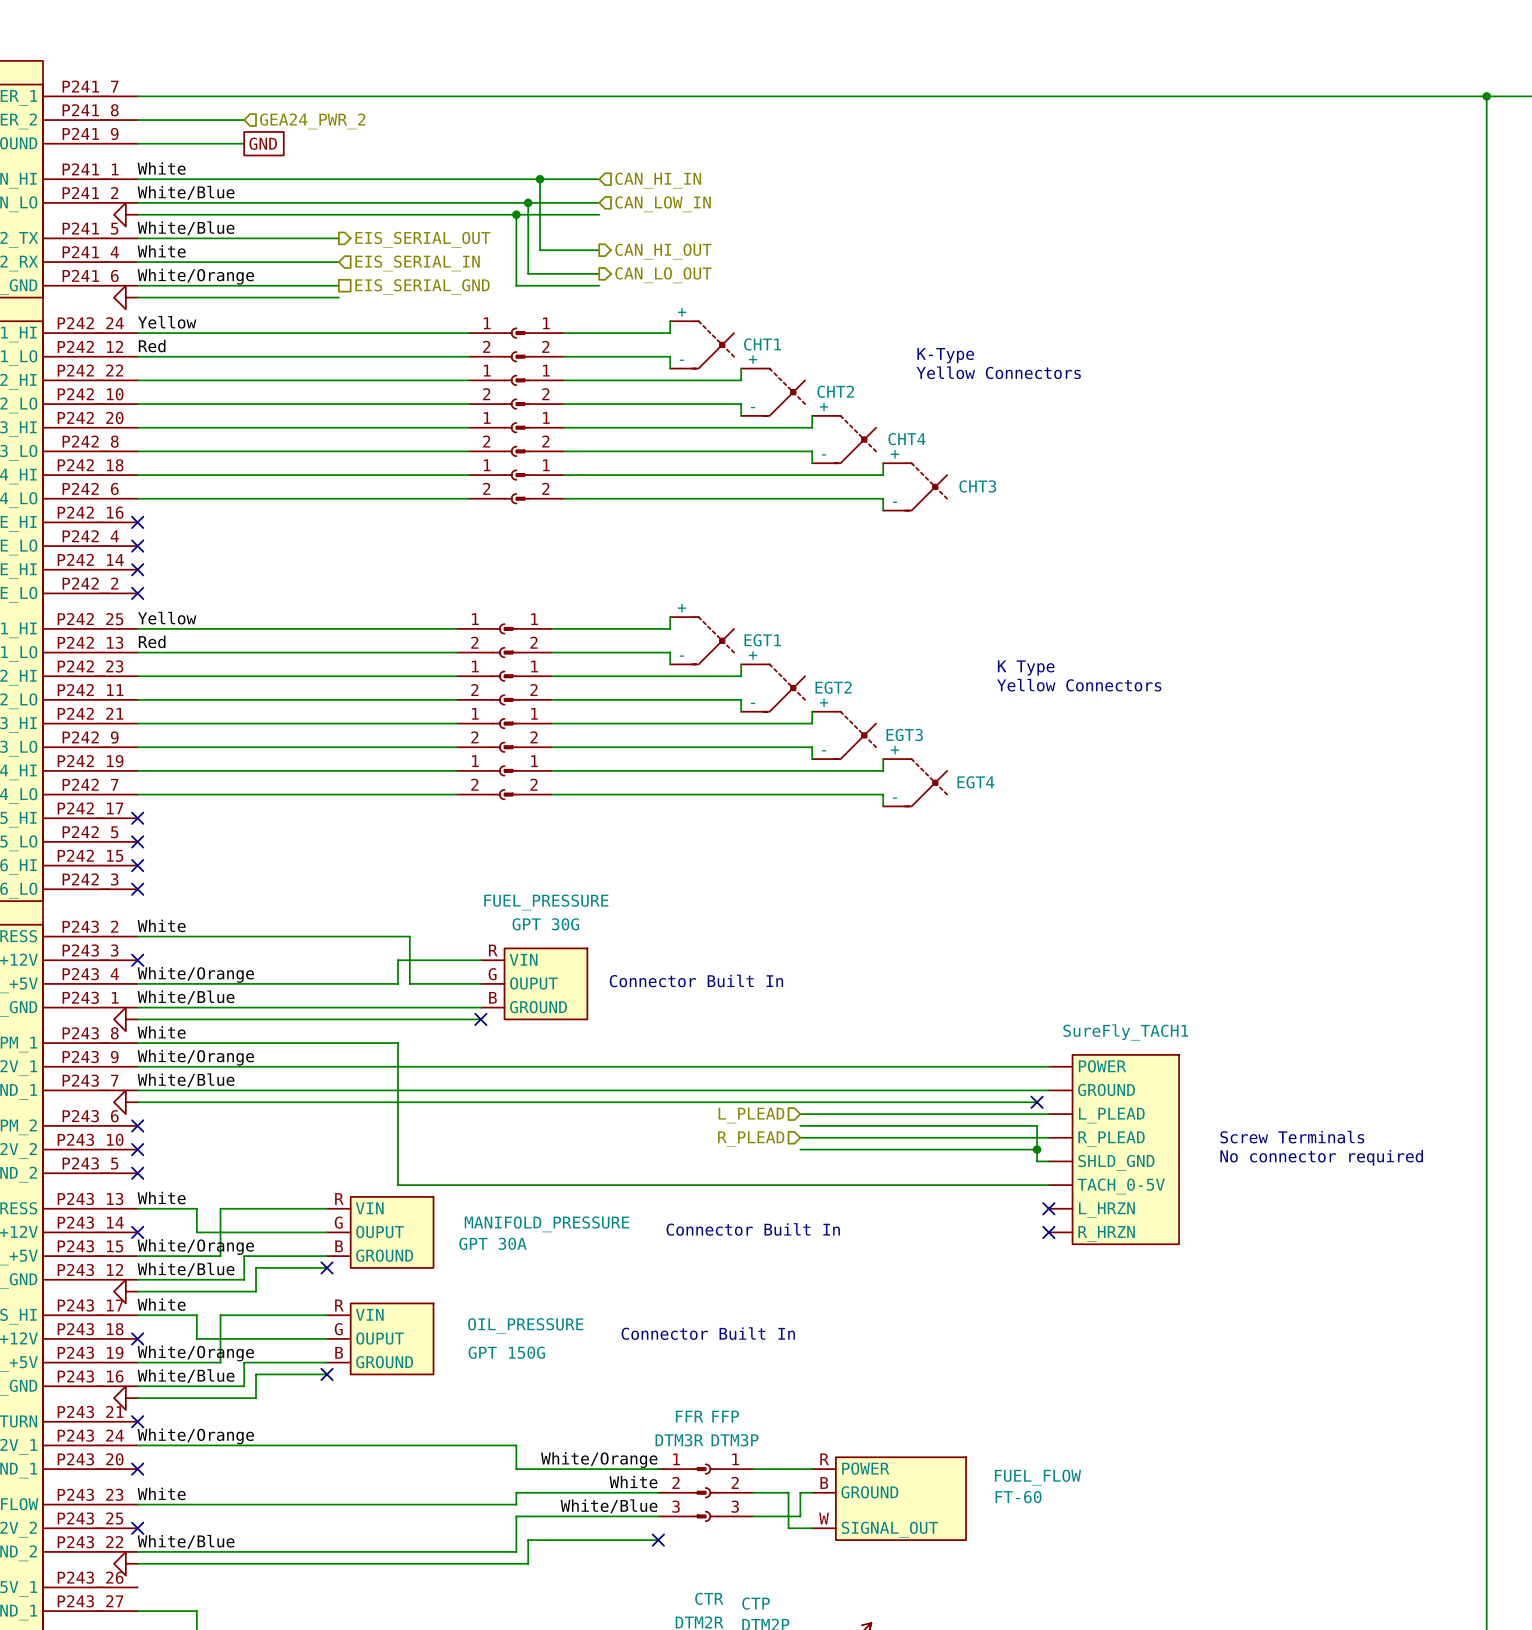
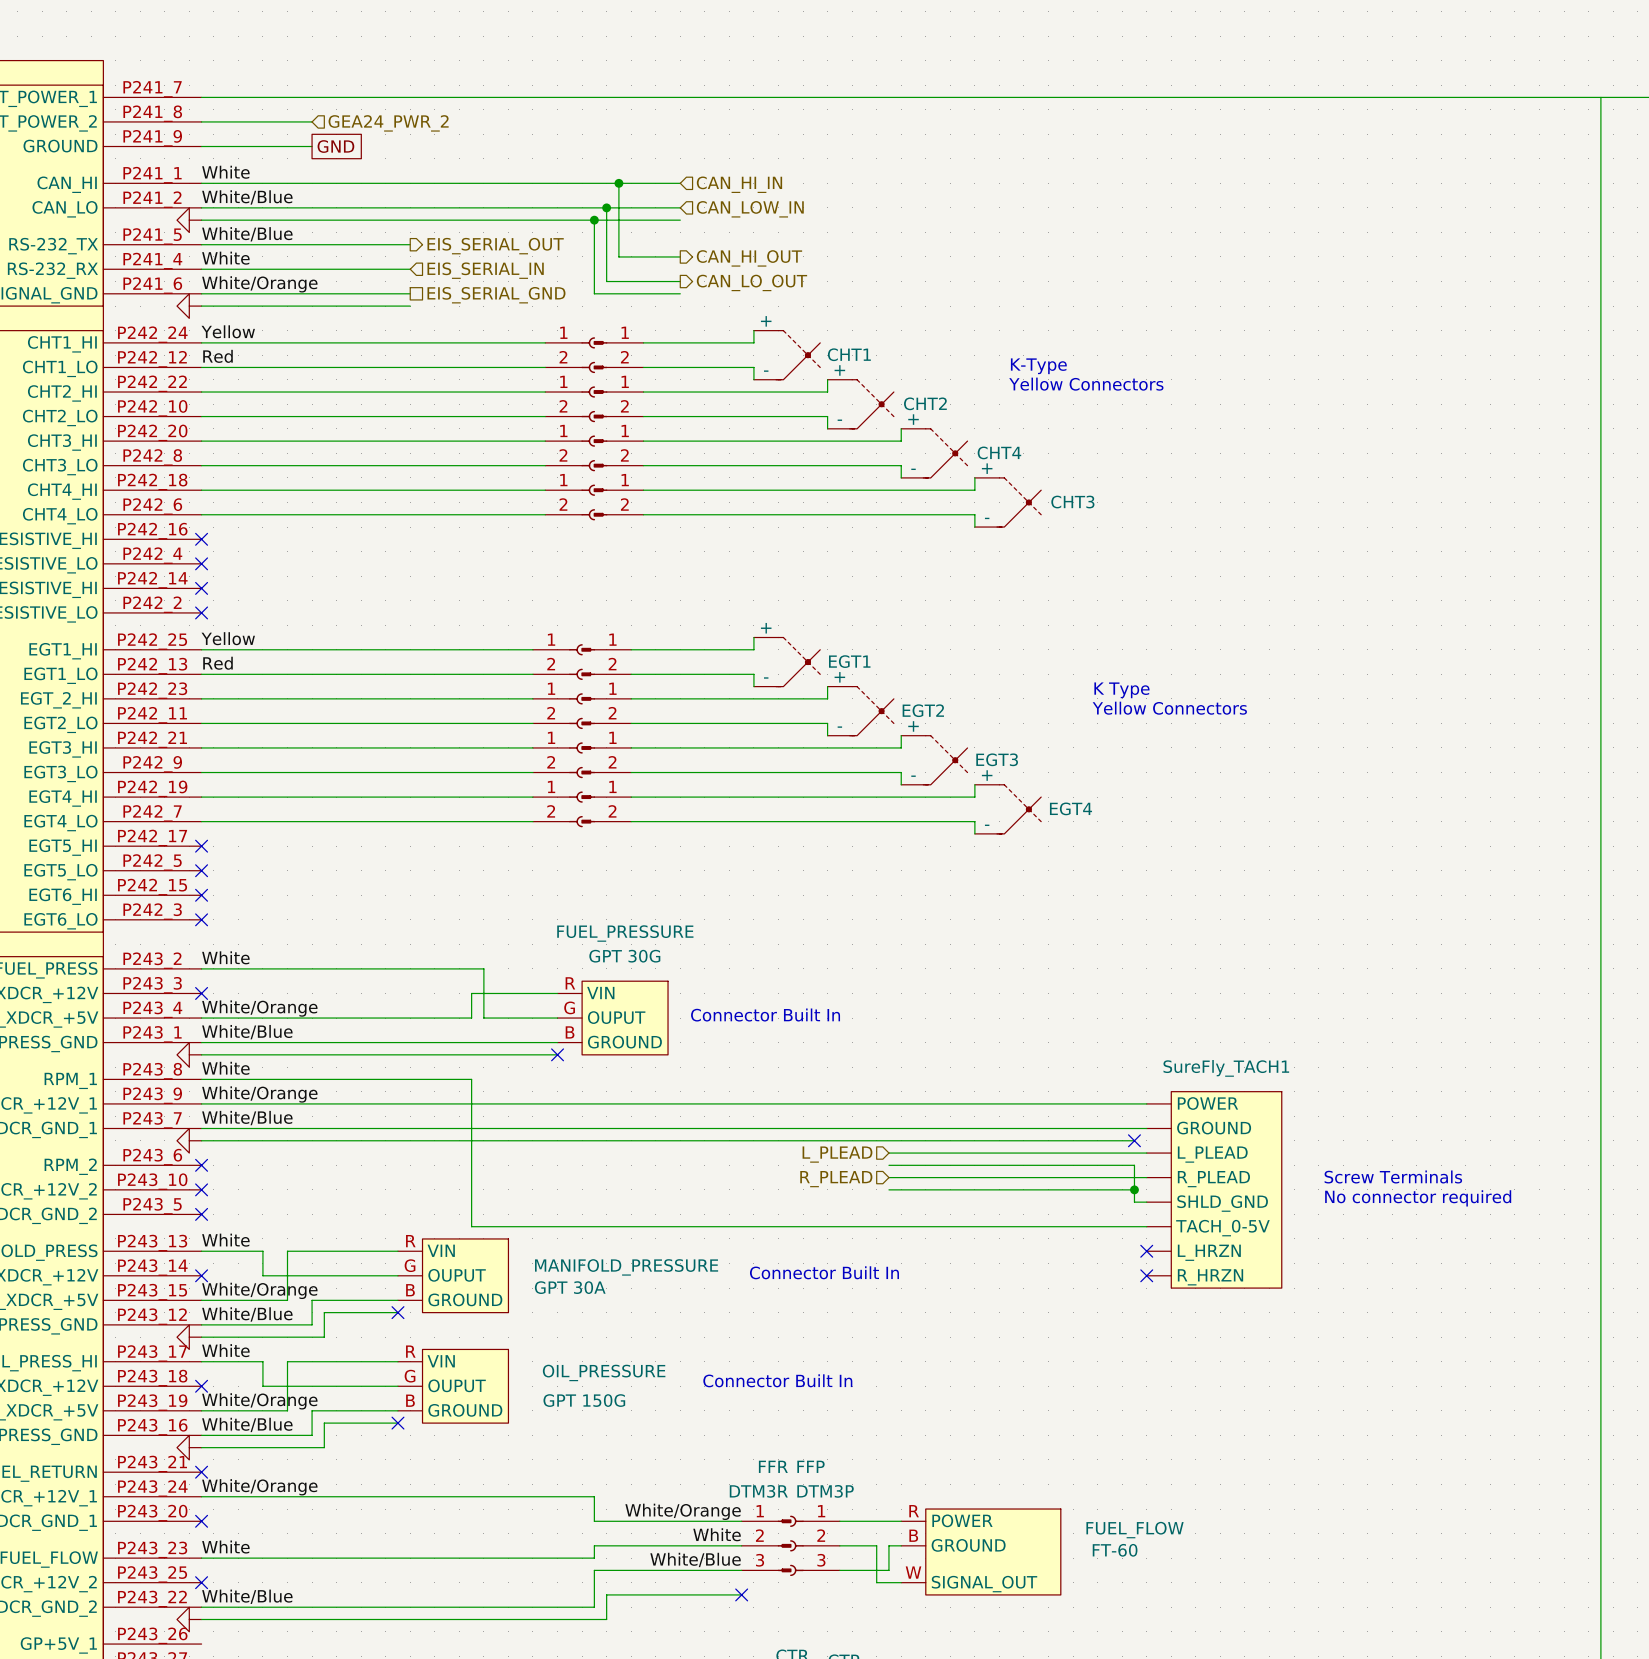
junction: (1486, 96) -> none

